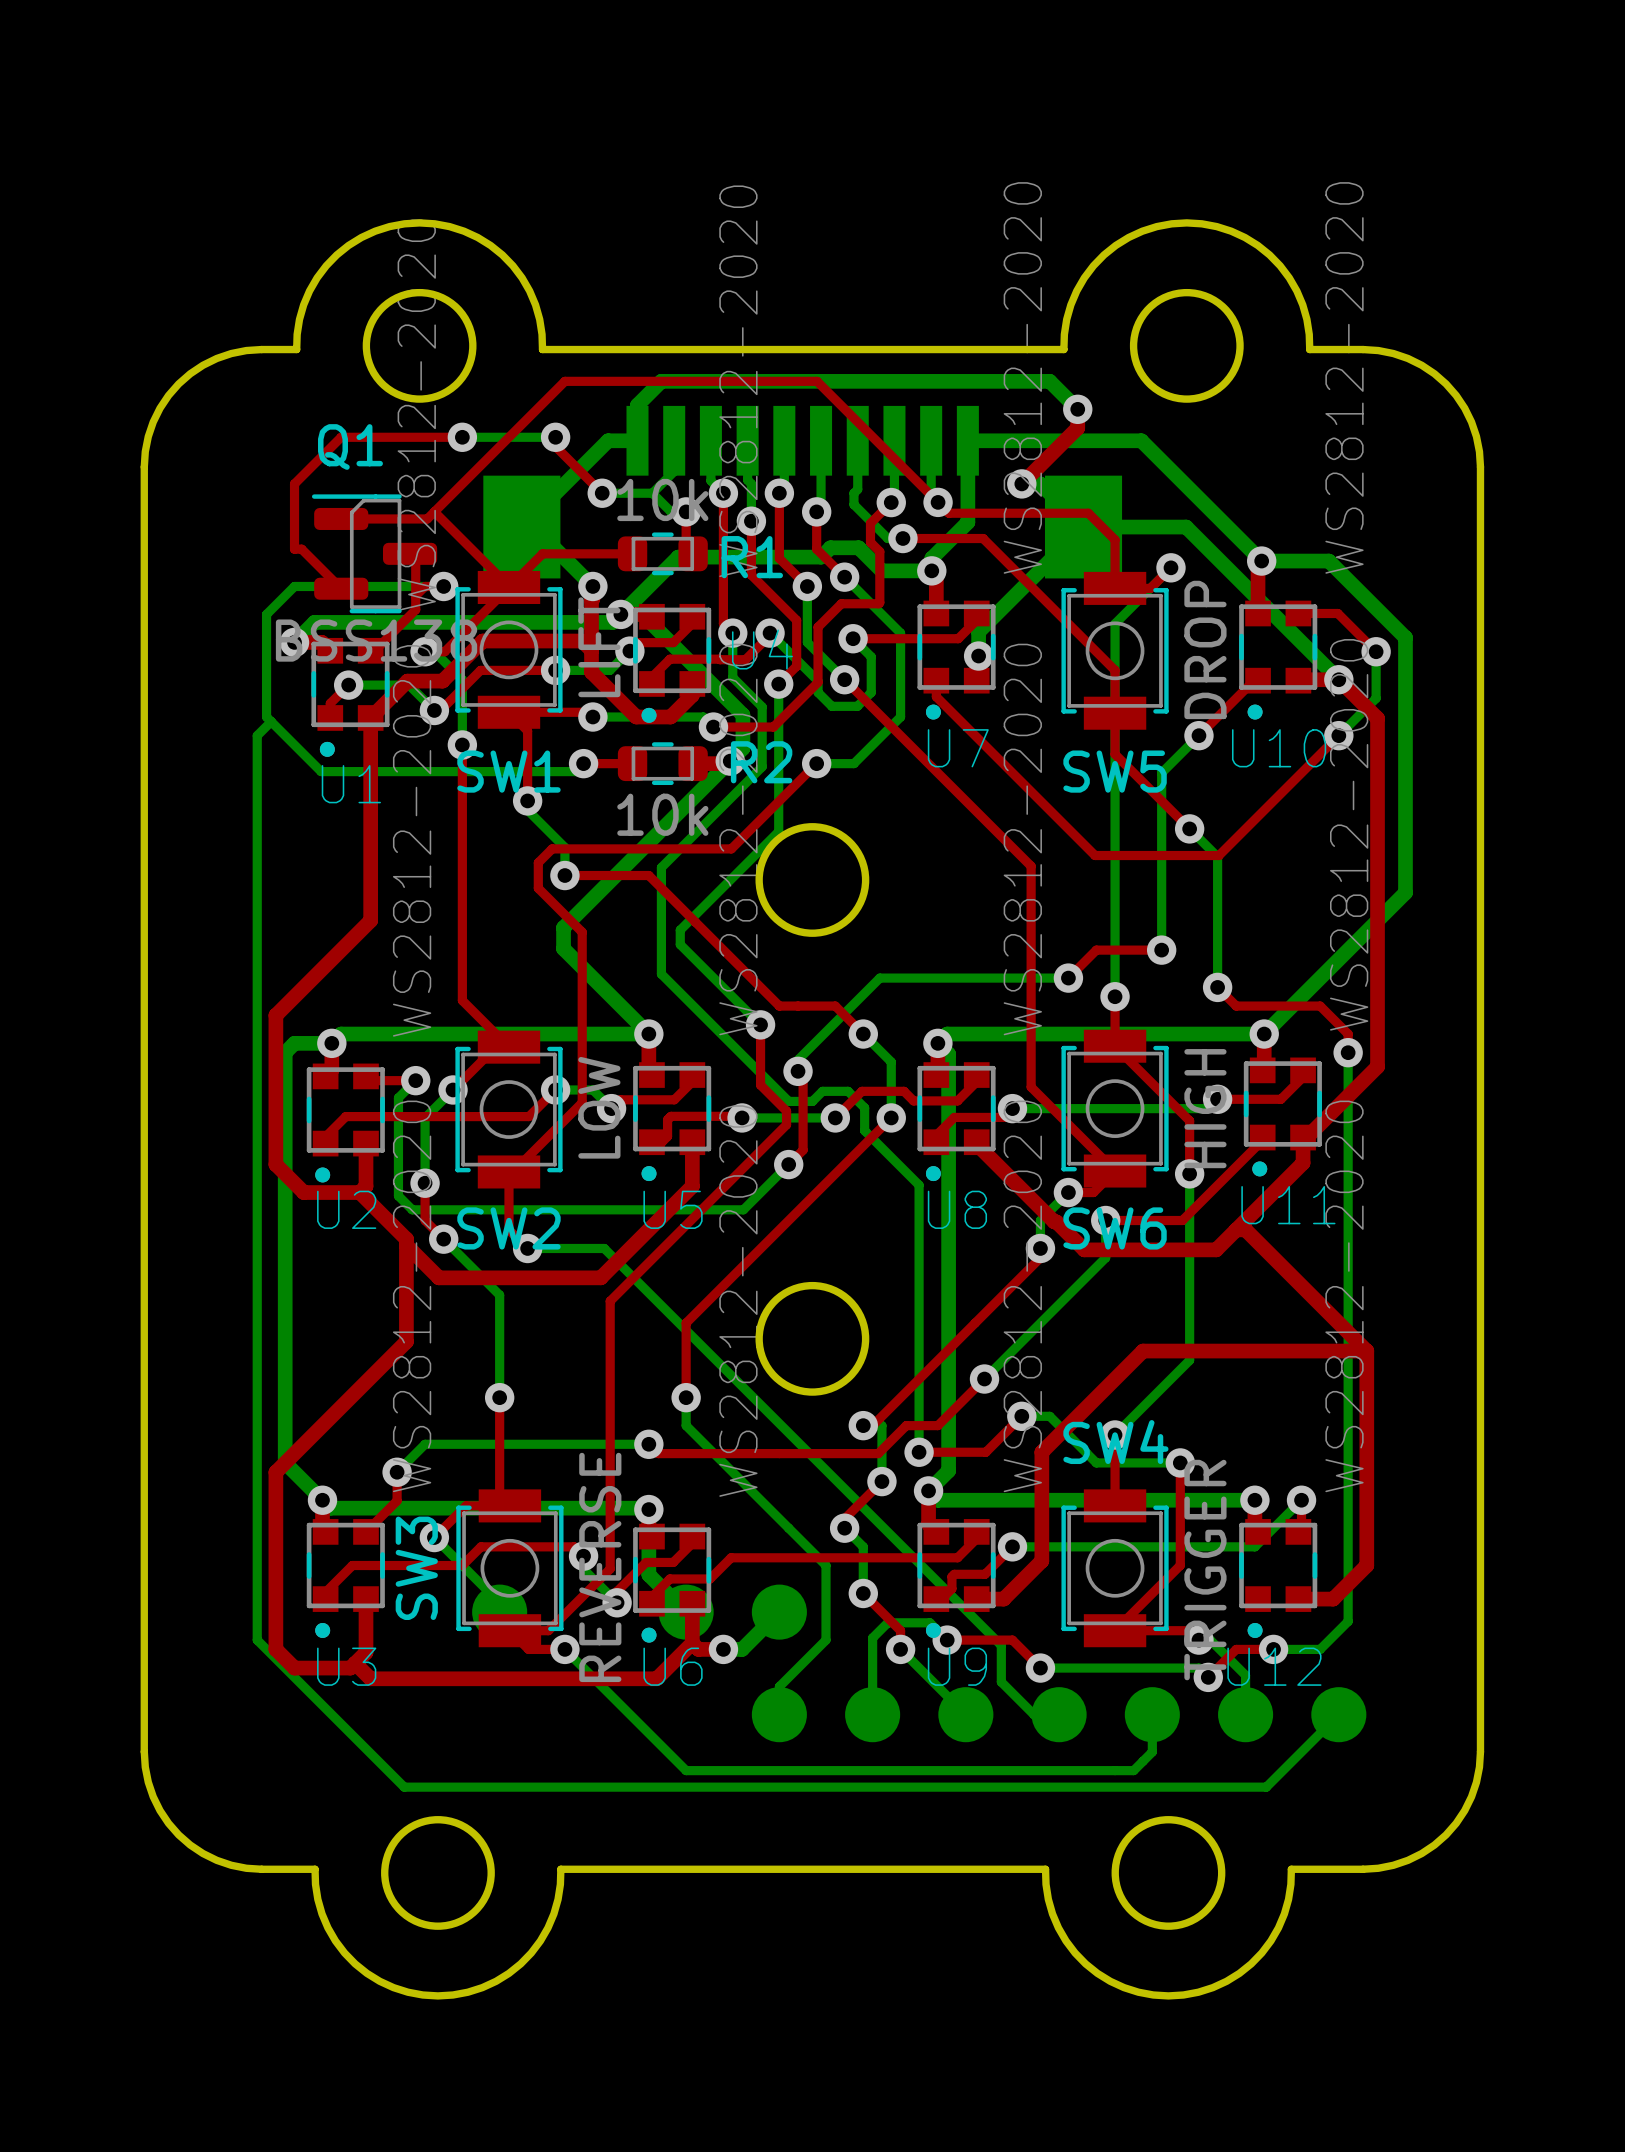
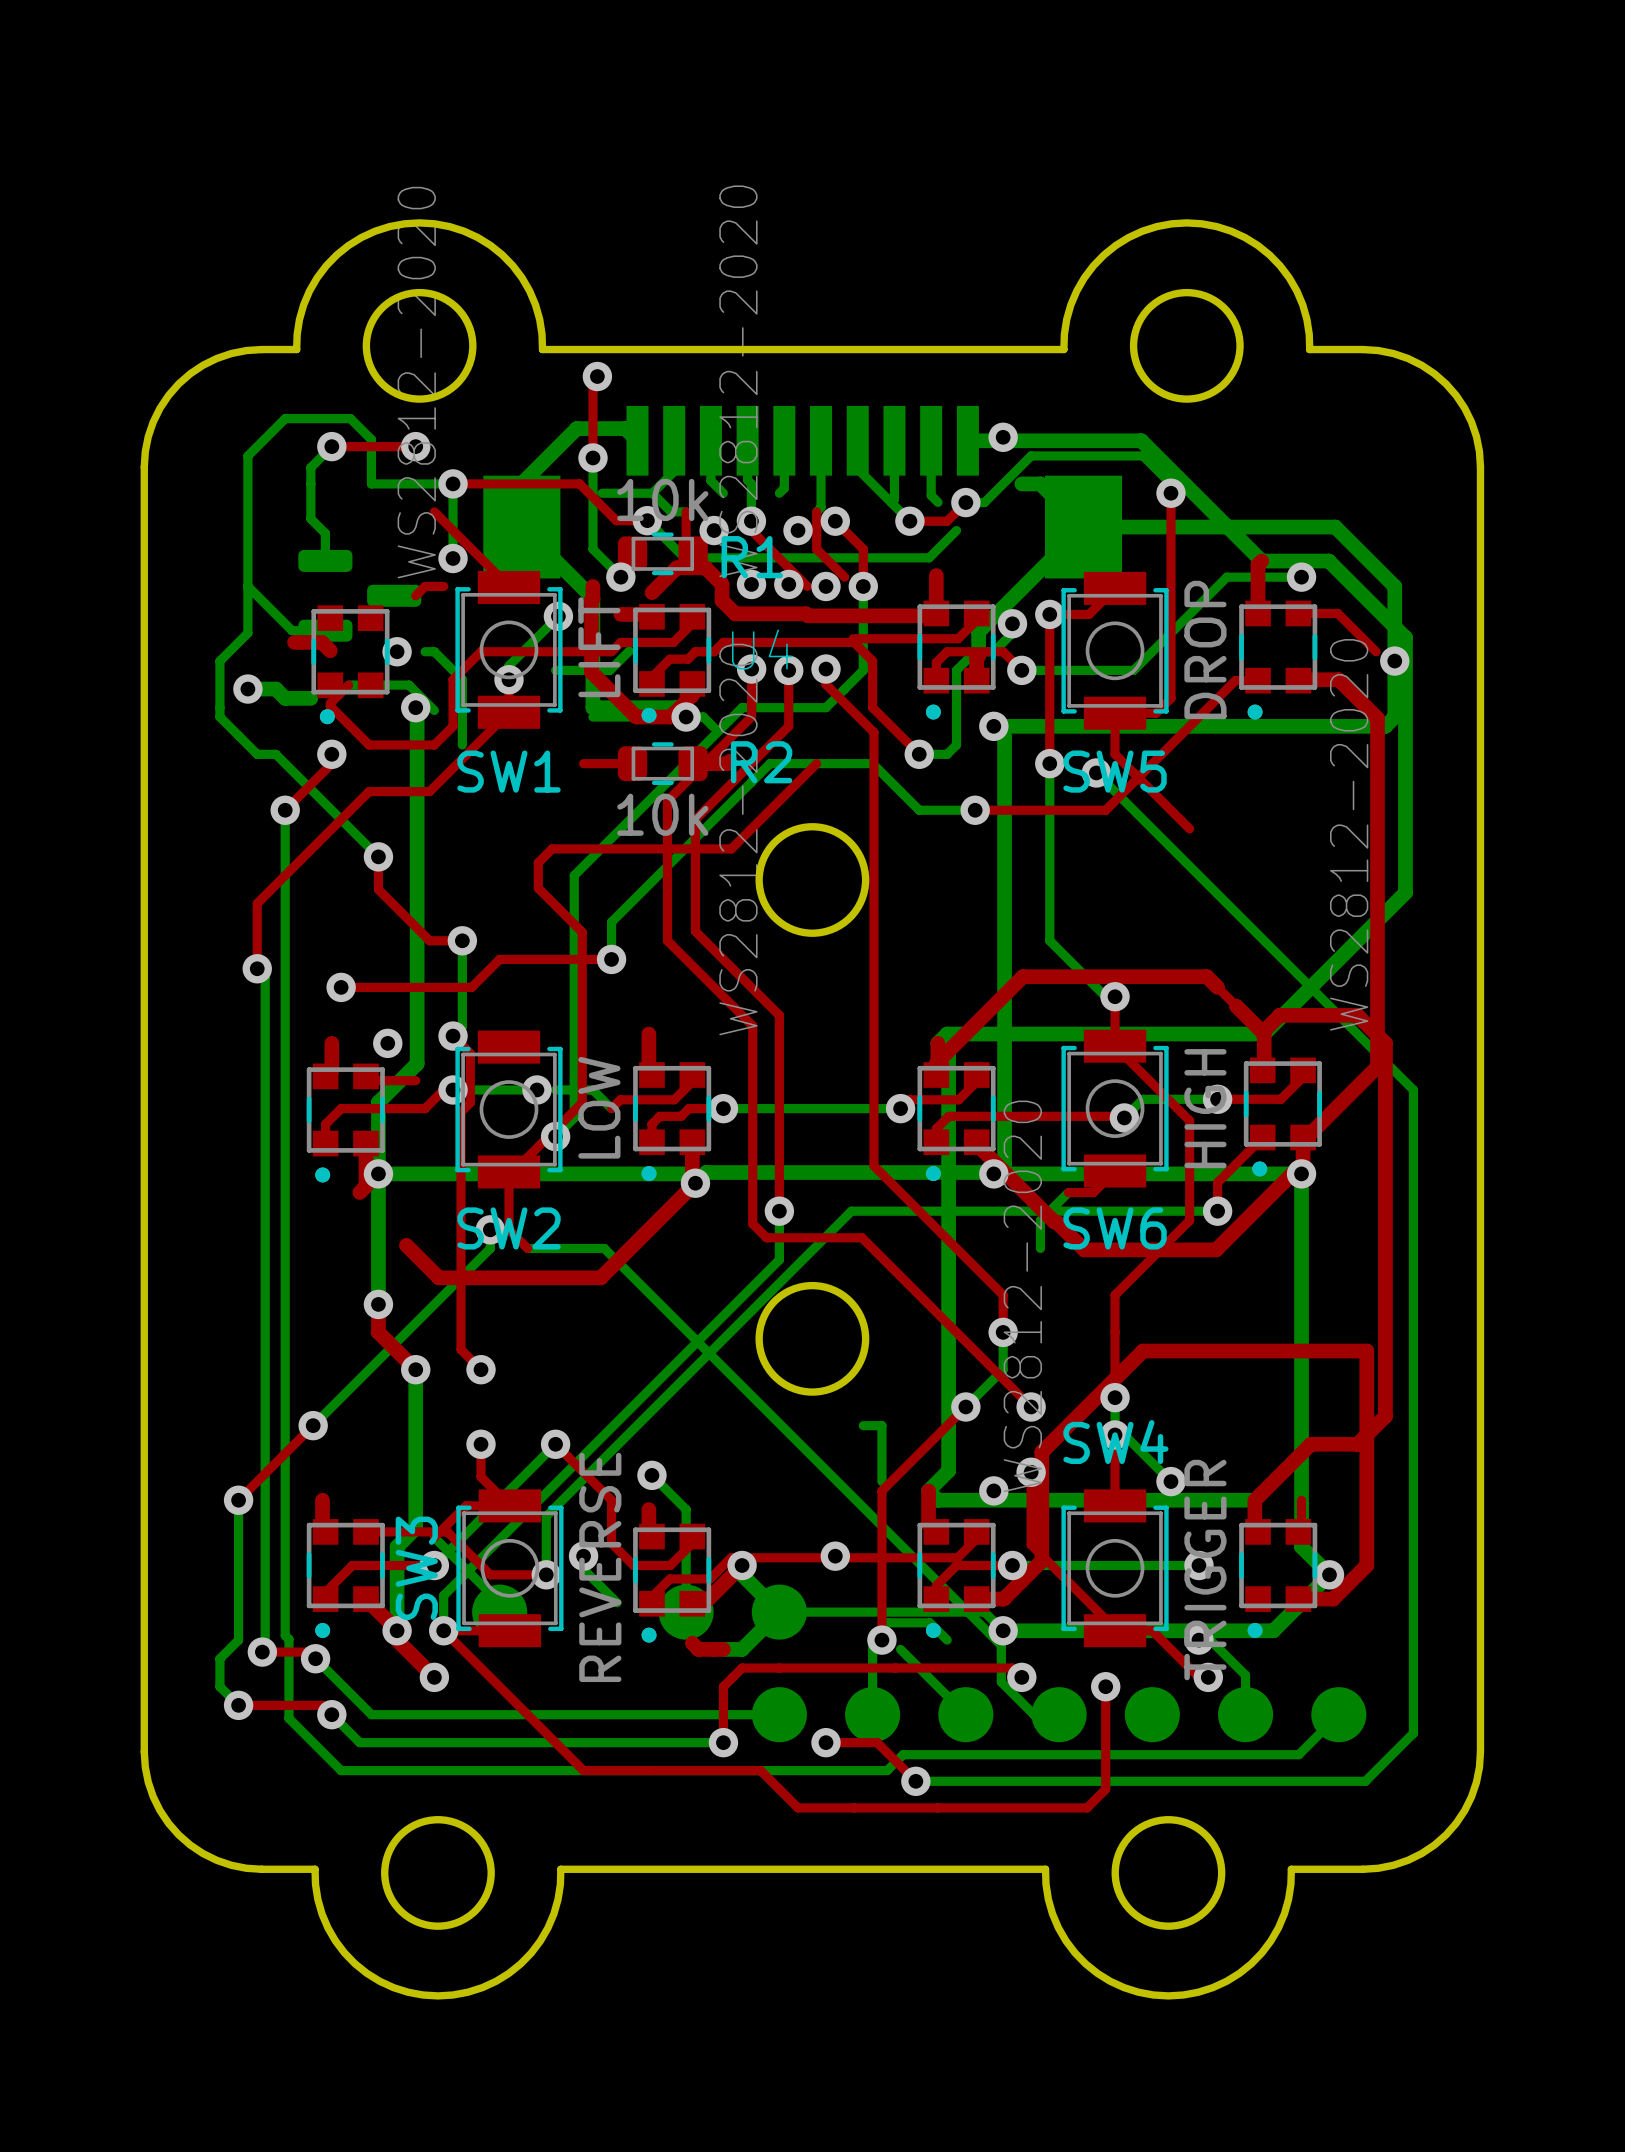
top track: none -> (597, 376) (593, 380) (593, 457)
via: none -> (597, 376)
U7 value: WS2812-2020 (1022, 377) -> none
U10 value: WS2812-2020 (1344, 377) -> none
top track: (1077, 409) (1077, 427) (1021, 483) -> none
bottom track: (1077, 409) (1049, 381) (661, 381) (637, 405) (637, 440) (608, 440) (521, 527) (533, 527) (592, 586) -> none
via: (1077, 409) -> none
top track: (462, 437) (341, 437) (294, 483) (294, 549) (301, 549) (341, 588) -> none
bottom track: (462, 437) (555, 437) -> none
via: (462, 437) -> none
top track: (555, 437) (555, 446) (602, 493) -> none
via: (555, 437) -> none
via: none -> (1003, 437)
bottom track: none -> (637, 440) (625, 428) (576, 428) (521, 483) (521, 527) (592, 598) (592, 707) (676, 707) (686, 717)
bottom track: (967, 440) (967, 522) (931, 558) (931, 570) (881, 570) (858, 547) (830, 547) (821, 557) (678, 557) (612, 622) (314, 622) (294, 642) -> none
top track: none -> (331, 446) (415, 446)
bottom track: none -> (331, 446) (310, 467) (310, 518) (325, 533) (325, 560)
via: none -> (331, 446)
via: none -> (415, 446)
bottom track: none -> (593, 457) (593, 549) (620, 577)
via: none -> (593, 457)
bottom track: (857, 469) (857, 489) (853, 493) (853, 504) (887, 538) (902, 538) -> (857, 469) (909, 521)
top track: none -> (453, 483) (579, 483) (616, 520) (647, 520)
via: none -> (453, 483)
via: (1021, 483) -> none
via: (602, 493) -> none
top track: (723, 493) (723, 623) (732, 633) -> none
via: (723, 493) -> none
top track: (779, 493) (779, 558) -> (751, 530) (779, 558)
via: (779, 493) -> none
bottom track: none -> (1170, 493) (1170, 483) (1143, 455) (1031, 455) (984, 502) (965, 502)
via: none -> (1170, 493)
top track: (891, 502) (870, 523) (870, 542) (879, 551) (879, 602) (841, 603) (818, 627) (818, 682) (773, 727) (713, 727) -> none
via: (891, 502) -> none
via: (938, 502) -> none
top track: none -> (965, 502) (947, 521) (909, 521)
via: none -> (965, 502)
via position: (686, 511) -> (714, 530)
via: (816, 511) -> none
top track: (341, 518) (427, 518) (564, 381) (817, 381) (948, 513) (1088, 513) (1115, 539) (1115, 588) (1150, 588) (1170, 567) -> none
bottom track: none -> (647, 520) (684, 557) (929, 557) (956, 530)
via: none -> (647, 520)
top track: (751, 521) (751, 575) (796, 620) (796, 666) (778, 684) -> none
top track: none -> (835, 521) (863, 549) (863, 586)
via: none -> (835, 521)
via: none -> (909, 521)
bottom track: (1186, 527) (1338, 679) -> (1186, 527) (1335, 527) (1394, 586) (1394, 717) (1385, 726) (993, 726) (1004, 737) (1004, 1163) (993, 1173)
via: none -> (798, 530)
top track: (902, 538) (983, 538) (1115, 670) (1115, 713) -> (1170, 493) (1170, 698) (1156, 713) (1115, 713)
via: (902, 538) -> none
Q1 side: top (374, 553) -> bottom (359, 595)
top track: (410, 553) (415, 559) (415, 609) (374, 650) (370, 650) -> none
top track: (632, 553) (542, 553) (444, 651) (425, 651) -> none
bottom track: none -> (453, 558) (453, 483) (371, 483) (371, 439) (350, 418) (285, 418) (247, 455) (247, 633) (219, 661) (219, 717) (257, 754) (275, 754) (378, 856)
via position: (1261, 561) -> (1301, 577)
bottom track: (1170, 567) (1115, 623) (1115, 996) -> none
via: (1170, 567) -> none
via: (931, 570) -> none
bottom track: (844, 577) (900, 633) (900, 717) (853, 763) -> (975, 810) (919, 810) (872, 763) (853, 763)
via: (844, 577) -> none
bottom track: none -> (1301, 577) (1226, 577) (1133, 670) (1021, 670)
via: none -> (751, 584)
via: none -> (788, 584)
bottom track: none -> (247, 586) (292, 630) (325, 630)
bottom track: (443, 586) (294, 586) (266, 614) (266, 717) (321, 771) (575, 771) (583, 763) -> none
via position: (443, 586) -> (453, 558)
via position: (592, 586) -> (620, 577)
bottom track: (807, 586) (807, 642) (844, 679) -> none
via: (807, 586) -> none
via: none -> (826, 586)
bottom track: none -> (863, 586) (863, 670) (826, 707) (742, 707) (574, 875) (574, 1117) (555, 1136)
via: none -> (863, 586)
top track: none -> (1115, 588) (1089, 614) (1049, 614) (1049, 763)
top track: none -> (651, 592) (676, 567) (705, 567) (722, 584) (722, 600) (735, 613) (934, 615)
bottom track: (620, 614) (642, 614) (742, 714) (742, 748) (563, 927) (563, 948) (648, 1034) (341, 1034) (331, 1043) (294, 1043) (285, 1052) -> (285, 810) (285, 1052)
via: (620, 614) -> none
via: none -> (1049, 614)
bottom track: none -> (558, 616) (508, 665) (508, 679)
via: none -> (558, 616)
bottom track: none -> (1012, 623) (1012, 633) (993, 651) (975, 651) (956, 670) (956, 744) (947, 754) (919, 754)
via: none -> (1012, 623)
bottom track: (732, 633) (732, 677) (762, 706) (762, 766) (661, 867) (661, 974) (788, 1101) (812, 1101) (822, 1091) (848, 1091) (864, 1107) (864, 1130) (919, 1185) (919, 1452) -> none
via: (732, 633) -> none
top track: (770, 633) (745, 659) (688, 659) -> (872, 707) (872, 661) (853, 642) (723, 642) (714, 651) (695, 651) (688, 659)
bottom track: (770, 633) (818, 681) (818, 692) (831, 706) (857, 706) (871, 692) (871, 656) (853, 638) -> none
via: (770, 633) -> none
via: (853, 638) -> none
via: (294, 642) -> none
top track: (673, 642) (638, 642) (629, 651) -> (673, 642) (620, 642) (611, 651) (481, 651) (453, 679) (453, 726) (434, 744) (369, 744) (330, 706)
top track: (591, 650) (582, 641) (482, 641) (442, 681) (407, 681) (370, 717) (370, 920) (275, 1015) (275, 1164) (303, 1192) (359, 1192) (406, 1239) (406, 1341) (275, 1472) (275, 1649) (294, 1668) (350, 1668) (366, 1652) (366, 1599) -> (434, 1677) (397, 1640) (397, 1630) (366, 1599)
via position: (425, 651) -> (397, 651)
via: (629, 651) -> none
bottom track: (1376, 651) (1376, 698) (1338, 735) -> none
via position: (1376, 651) -> (1394, 661)
via: (978, 656) -> none
top track: none -> (751, 669) (751, 716) (667, 800) (667, 940) (752, 1026) (752, 1223) (766, 1237) (861, 1237) (1031, 1406)
via: none -> (751, 669)
top track: none -> (826, 669) (826, 684) (873, 732) (873, 1165) (1003, 1295) (1003, 1332)
top track: (555, 670) (480, 670) (440, 710) (434, 710) -> none
via: (555, 670) -> none
top track: none -> (788, 670) (788, 726) (695, 819) (695, 931) (779, 1015) (779, 1211)
via: none -> (788, 670)
via: none -> (1021, 670)
top track: none -> (508, 679) (508, 712) (429, 791) (369, 791) (257, 903) (257, 968)
via: none -> (508, 679)
top track: (844, 679) (872, 707) -> none
via position: (844, 679) -> (826, 669)
via: (1338, 679) -> none
top track: (936, 680) (936, 696) (1095, 855) (1218, 855) (1338, 735) -> (936, 680) (936, 662) (947, 651) (1003, 651) (1021, 670)
top track: (1253, 680) (1198, 735) -> (1253, 680) (1235, 680) (1105, 810) (975, 810)
bottom track: (778, 684) (778, 831) (680, 930) (680, 944) (760, 1024) -> none
via: (778, 684) -> none
via: (348, 685) -> none
bottom track: none -> (247, 689) (275, 689) (285, 698) (310, 698)
via: none -> (247, 689)
U1 position: (350, 697) -> (350, 664)
bottom track: none -> (415, 707) (417, 1063) (378, 1102) (378, 1304)
via position: (434, 710) -> (415, 707)
top track: (592, 717) (588, 712) (508, 712) (527, 730) (527, 800) -> none
via: (592, 717) -> none
bottom track: (271, 721) (257, 735) (257, 1640) (331, 1714) -> none
via: none -> (993, 726)
via position: (713, 727) -> (686, 717)
bottom track: (1198, 735) (1161, 772) (1161, 950) -> none
via: (1198, 735) -> none
via: (1338, 735) -> none
top track: (462, 744) (462, 1000) (508, 1047) (495, 1047) (453, 1089) -> none
via: (462, 744) -> none
U7 name: U7 (958, 748) -> none
U10 name: U10 (1279, 748) -> none
top track: none -> (331, 754) (331, 763) (285, 810)
via: none -> (331, 754)
top track: (919, 754) (1031, 866) (1031, 1087) (1115, 1171) -> none
via: none -> (919, 754)
via: (730, 761) -> none
via: (583, 763) -> none
bottom track: none -> (816, 763) (770, 763) (611, 922) (611, 959)
via: (816, 763) -> none
bottom track: none -> (1049, 763) (1049, 940) (1115, 1006)
via: none -> (1049, 763)
bottom track: none -> (1096, 772) (1413, 1089) (1413, 1733) (1365, 1781) (915, 1781)
via: none -> (1096, 772)
U1 name: U1 (351, 784) -> none
bottom track: (527, 800) (527, 810) (564, 847) (564, 875) -> none
via: (527, 800) -> none
via: none -> (285, 810)
via: none -> (975, 810)
bottom track: (1189, 828) (1217, 856) (1217, 987) -> none
via: (1189, 828) -> none
U8 value: WS2812-2020 (1022, 839) -> none
U2 value: WS2812-2020 (412, 840) -> none
top track: none -> (378, 856) (378, 889) (429, 940) (462, 940)
via: none -> (378, 856)
top track: (564, 875) (648, 875) (779, 1006) (835, 1006) (863, 1034) -> none
via: (564, 875) -> none
bottom track: none -> (462, 940) (462, 1026) (453, 1036)
via: none -> (462, 940)
top track: (1161, 950) (1096, 950) (1068, 978) -> none
via: (1161, 950) -> none
top track: none -> (611, 959) (499, 959) (471, 987) (341, 987)
via: none -> (611, 959)
bottom track: none -> (257, 968) (265, 976) (265, 1649) (262, 1652)
via: none -> (257, 968)
bottom track: (1068, 978) (879, 978) (798, 1059) (798, 1071) -> none
via: (1068, 978) -> none
via: none -> (341, 987)
top track: none -> (1217, 987) (1206, 976) (1022, 976) (936, 1063)
via: (1217, 987) -> none
top track: (1236, 1006) (1320, 1006) (1348, 1034) (1348, 1052) -> (1236, 1006) (1262, 1032) (1279, 1015) (1357, 1015) (1385, 1043) (1385, 1416) (1357, 1444) (1310, 1444) (1258, 1497)
top track: (760, 1024) (760, 1085) (786, 1111) (786, 1124) (610, 1301) (610, 1568) (548, 1630) (509, 1630) (528, 1649) (564, 1649) -> none
via: (760, 1024) -> none
via: (648, 1034) -> none
bottom track: (863, 1034) (891, 1062) (891, 1117) -> none
via: (863, 1034) -> none
via: (1264, 1034) -> none
top track: none -> (453, 1036) (470, 1053) (470, 1102) (461, 1112) (461, 1349) (481, 1369)
via: none -> (453, 1036)
via: (331, 1043) -> none
via: none -> (387, 1043)
via: (937, 1043) -> none
bottom track width: thick (285, 1052) (285, 1462) -> thin (285, 1052) (285, 1462)
bottom track: (1348, 1052) (1348, 1621) (1320, 1649) (1273, 1649) -> none
via: (1348, 1052) -> none
top track: (798, 1071) (803, 1076) (803, 1150) (788, 1164) -> none
via: (798, 1071) -> none
bottom track: (415, 1080) (398, 1097) (398, 1195) (412, 1209) (743, 1209) (788, 1164) -> none
via: (415, 1080) -> none
bottom track: (453, 1089) (425, 1117) (425, 1183) -> none
top track: (555, 1089) (528, 1116) (345, 1116) (325, 1136) -> (443, 1089) (425, 1108) (341, 1108) (325, 1124) (325, 1136)
via position: (555, 1089) -> (536, 1089)
top track: (958, 1099) (913, 1100) (904, 1091) (861, 1091) (835, 1117) -> (958, 1099) (909, 1099) (900, 1108)
bottom track: (1217, 1099) (1208, 1108) (1012, 1108) -> (1217, 1099) (1143, 1099) (1124, 1117)
via: (611, 1108) -> none
bottom track: none -> (723, 1108) (900, 1108)
top track: (1012, 1108) (1003, 1117) (954, 1117) (936, 1135) -> (1124, 1117) (1122, 1116) (948, 1116) (936, 1128) (936, 1135)
via: (1012, 1108) -> none
top track: (671, 1116) (667, 1119) (667, 1136) (661, 1142) (651, 1142) -> (671, 1116) (659, 1116) (651, 1124) (651, 1142)
top track: (681, 1116) (740, 1116) (742, 1117) -> (681, 1116) (688, 1108) (723, 1108)
bottom track: (742, 1117) (835, 1117) -> (443, 1089) (536, 1089)
via position: (742, 1117) -> (723, 1108)
via: (835, 1117) -> none
top track: (891, 1117) (686, 1323) (686, 1397) -> none
via position: (891, 1117) -> (900, 1108)
via: none -> (1124, 1117)
via: none -> (555, 1136)
top track: (1262, 1137) (1262, 1140) (1182, 1220) (1105, 1220) -> (1262, 1137) (1217, 1182) (1217, 1211)
via: (788, 1164) -> none
bottom track: none -> (378, 1173) (686, 1173) (695, 1183) (706, 1172) (993, 1173)
via: none -> (378, 1173)
bottom track: none -> (993, 1173) (1301, 1173) (1301, 1546) (1329, 1574) (1273, 1630) (1003, 1630) (984, 1612) (779, 1612) (742, 1574) (742, 1565)
via: none -> (993, 1173)
top track: none -> (1189, 1173) (1189, 1220) (1115, 1295) (1115, 1397)
bottom track: (1189, 1173) (1189, 1360) (1115, 1434) -> none
via: (1189, 1173) -> none
via: none -> (1301, 1173)
top track: (425, 1183) (425, 1220) (443, 1239) -> none
via: (425, 1183) -> none
via: none -> (695, 1183)
via: (1068, 1192) -> none
U11 name: U11 (1288, 1205) -> none
U2 name: U2 (346, 1209) -> none
U5 name: U5 (673, 1209) -> none
U8 name: U8 (957, 1209) -> none
bottom track: none -> (779, 1211) (779, 1259) (443, 1595) (443, 1630)
via: none -> (779, 1211)
bottom track: none -> (1217, 1211) (851, 1211) (546, 1516) (546, 1574)
via: none -> (1217, 1211)
bottom track: (1105, 1220) (1105, 1257) (984, 1379) -> none
via: (1105, 1220) -> none
bottom track: none -> (490, 1229) (490, 1248) (313, 1425)
via: none -> (490, 1229)
top track: (1236, 1229) (1245, 1229) (1366, 1351) -> none
bottom track: (443, 1239) (499, 1295) (499, 1397) -> none
via: (443, 1239) -> none
via: (527, 1248) -> none
top track: (1040, 1248) (1040, 1257) (872, 1425) (863, 1425) -> none
via: (1040, 1248) -> none
U3 value: WS2812-2020 (412, 1296) -> none
U12 value: WS2812-2020 (1344, 1296) -> none
U6 value: WS2812-2020 (738, 1301) -> none
top track: none -> (378, 1304) (378, 1332) (415, 1369)
via: none -> (378, 1304)
bottom track: none -> (1003, 1332) (1003, 1369) (965, 1406)
via: none -> (1003, 1332)
bottom track: none -> (415, 1369) (415, 1528) (397, 1546) (397, 1630)
via: none -> (415, 1369)
top track: (984, 1379) (937, 1425) (906, 1425) (878, 1453) (658, 1453) (648, 1444) -> none
via position: (984, 1379) -> (965, 1406)
top track: (499, 1397) (499, 1495) -> (481, 1444) (481, 1476) (499, 1495)
via position: (499, 1397) -> (481, 1369)
bottom track: (686, 1397) (686, 1425) (826, 1565) (826, 1640) (779, 1686) (779, 1714) -> (315, 1658) (371, 1714) (779, 1714)
via: (686, 1397) -> none
bottom track: none -> (1115, 1397) (1115, 1425) (1170, 1481)
via: none -> (1115, 1397)
top track: none -> (965, 1406) (881, 1490) (881, 1640)
top track: (1021, 1416) (985, 1452) (919, 1452) -> none
bottom track: (1021, 1416) (1049, 1416) (1096, 1462) (1180, 1462) -> none
via position: (1021, 1416) -> (1031, 1406)
top track: none -> (313, 1425) (238, 1500)
via: none -> (313, 1425)
via: (863, 1425) -> none
via: none -> (481, 1444)
bottom track: none -> (555, 1444) (434, 1565)
via: none -> (555, 1444)
bottom track: (648, 1444) (425, 1444) (397, 1472) -> none
via: (648, 1444) -> none
via: (919, 1452) -> none
bottom track: (285, 1462) (330, 1508) (647, 1508) (648, 1574) (686, 1612) -> (285, 1462) (285, 1635) (288, 1639) (288, 1718) (341, 1770) (686, 1770)
top track: (1180, 1462) (1180, 1565) (1115, 1630) -> (1031, 1472) (1031, 1544) (1115, 1630)
via position: (1180, 1462) -> (1170, 1481)
top track: (397, 1472) (397, 1500) (366, 1531) -> (546, 1574) (490, 1574) (447, 1531) (366, 1531)
via: (397, 1472) -> none
via: none -> (1031, 1472)
bottom track: none -> (651, 1475) (686, 1509) (686, 1612)
via: none -> (651, 1475)
top track: (881, 1481) (844, 1518) (844, 1528) -> none
via: (881, 1481) -> none
via: (928, 1490) -> none
via: none -> (993, 1490)
bottom track: none -> (238, 1500) (238, 1640) (219, 1658) (219, 1686) (238, 1705)
via: none -> (238, 1500)
via: (322, 1500) -> none
via: (1254, 1500) -> none
bottom track: (1301, 1500) (1254, 1546) (1012, 1546) -> none
via: (1301, 1500) -> none
via: (648, 1509) -> none
bottom track: (844, 1528) (863, 1546) (863, 1593) -> none
via position: (844, 1528) -> (835, 1556)
via position: (434, 1537) -> (434, 1565)
top track: (1012, 1546) (985, 1574) (954, 1574) (951, 1576) (951, 1588) (941, 1599) (936, 1599) -> (1012, 1565) (956, 1565) (936, 1585) (936, 1599)
via position: (1012, 1546) -> (1012, 1565)
top track: (583, 1556) (574, 1546) (481, 1546) (462, 1565) (434, 1565) -> none
top track: (673, 1562) (646, 1562) (617, 1591) (617, 1602) -> (673, 1562) (670, 1565) (633, 1565) (611, 1543) (611, 1500) (555, 1444)
via: none -> (742, 1565)
bottom track: none -> (1012, 1565) (1198, 1565)
via: none -> (1198, 1565)
via: none -> (546, 1574)
via: none -> (1329, 1574)
top track: (863, 1593) (900, 1630) (900, 1649) -> none
via: (863, 1593) -> none
via: (617, 1602) -> none
top track: (692, 1603) (692, 1643) (656, 1678) (370, 1678) (355, 1663) -> (692, 1603) (703, 1603) (742, 1565)
via: none -> (397, 1630)
via: none -> (443, 1630)
top track: none -> (509, 1630) (443, 1630) (583, 1770) (760, 1770) (798, 1807) (1087, 1807) (1105, 1789) (1105, 1686)
via: none -> (1003, 1630)
top track: (1152, 1630) (1189, 1630) (1198, 1640) -> (1152, 1630) (1198, 1677)
top track: (947, 1640) (1012, 1640) (1040, 1668) -> none
via: (947, 1640) -> none
bottom track: (564, 1649) (686, 1770) -> none
via: (564, 1649) -> none
via: (723, 1649) -> none
via position: (900, 1649) -> (881, 1640)
top track: (1273, 1649) (1236, 1649) (1208, 1677) -> none
via: (1273, 1649) -> none
top track: none -> (262, 1652) (308, 1652) (315, 1658)
via: none -> (262, 1652)
via: none -> (315, 1658)
U3 name: U3 (346, 1666) -> none
U6 name: U6 (673, 1666) -> none
U9 name: U9 (957, 1666) -> none
U12 name: U12 (1274, 1666) -> none
bottom track: (1040, 1668) (1198, 1668) (1208, 1677) -> none
via position: (1040, 1668) -> (1021, 1677)
via: none -> (434, 1677)
top track: none -> (1021, 1677) (1012, 1668) (742, 1668) (723, 1686) (723, 1742)
via: none -> (1105, 1686)
top track: none -> (238, 1705) (322, 1705) (331, 1714)
via: none -> (238, 1705)
via: none -> (331, 1714)
bottom track: (1152, 1714) (1152, 1751) (1133, 1770) (887, 1770) -> (1298, 1754) (903, 1754) (887, 1770)
bottom track: (359, 1742) (404, 1787) (1266, 1787) (1298, 1754) -> (359, 1742) (723, 1742)
via: none -> (723, 1742)
top track: none -> (826, 1742) (877, 1742) (915, 1781)
via: none -> (826, 1742)
via: none -> (915, 1781)

